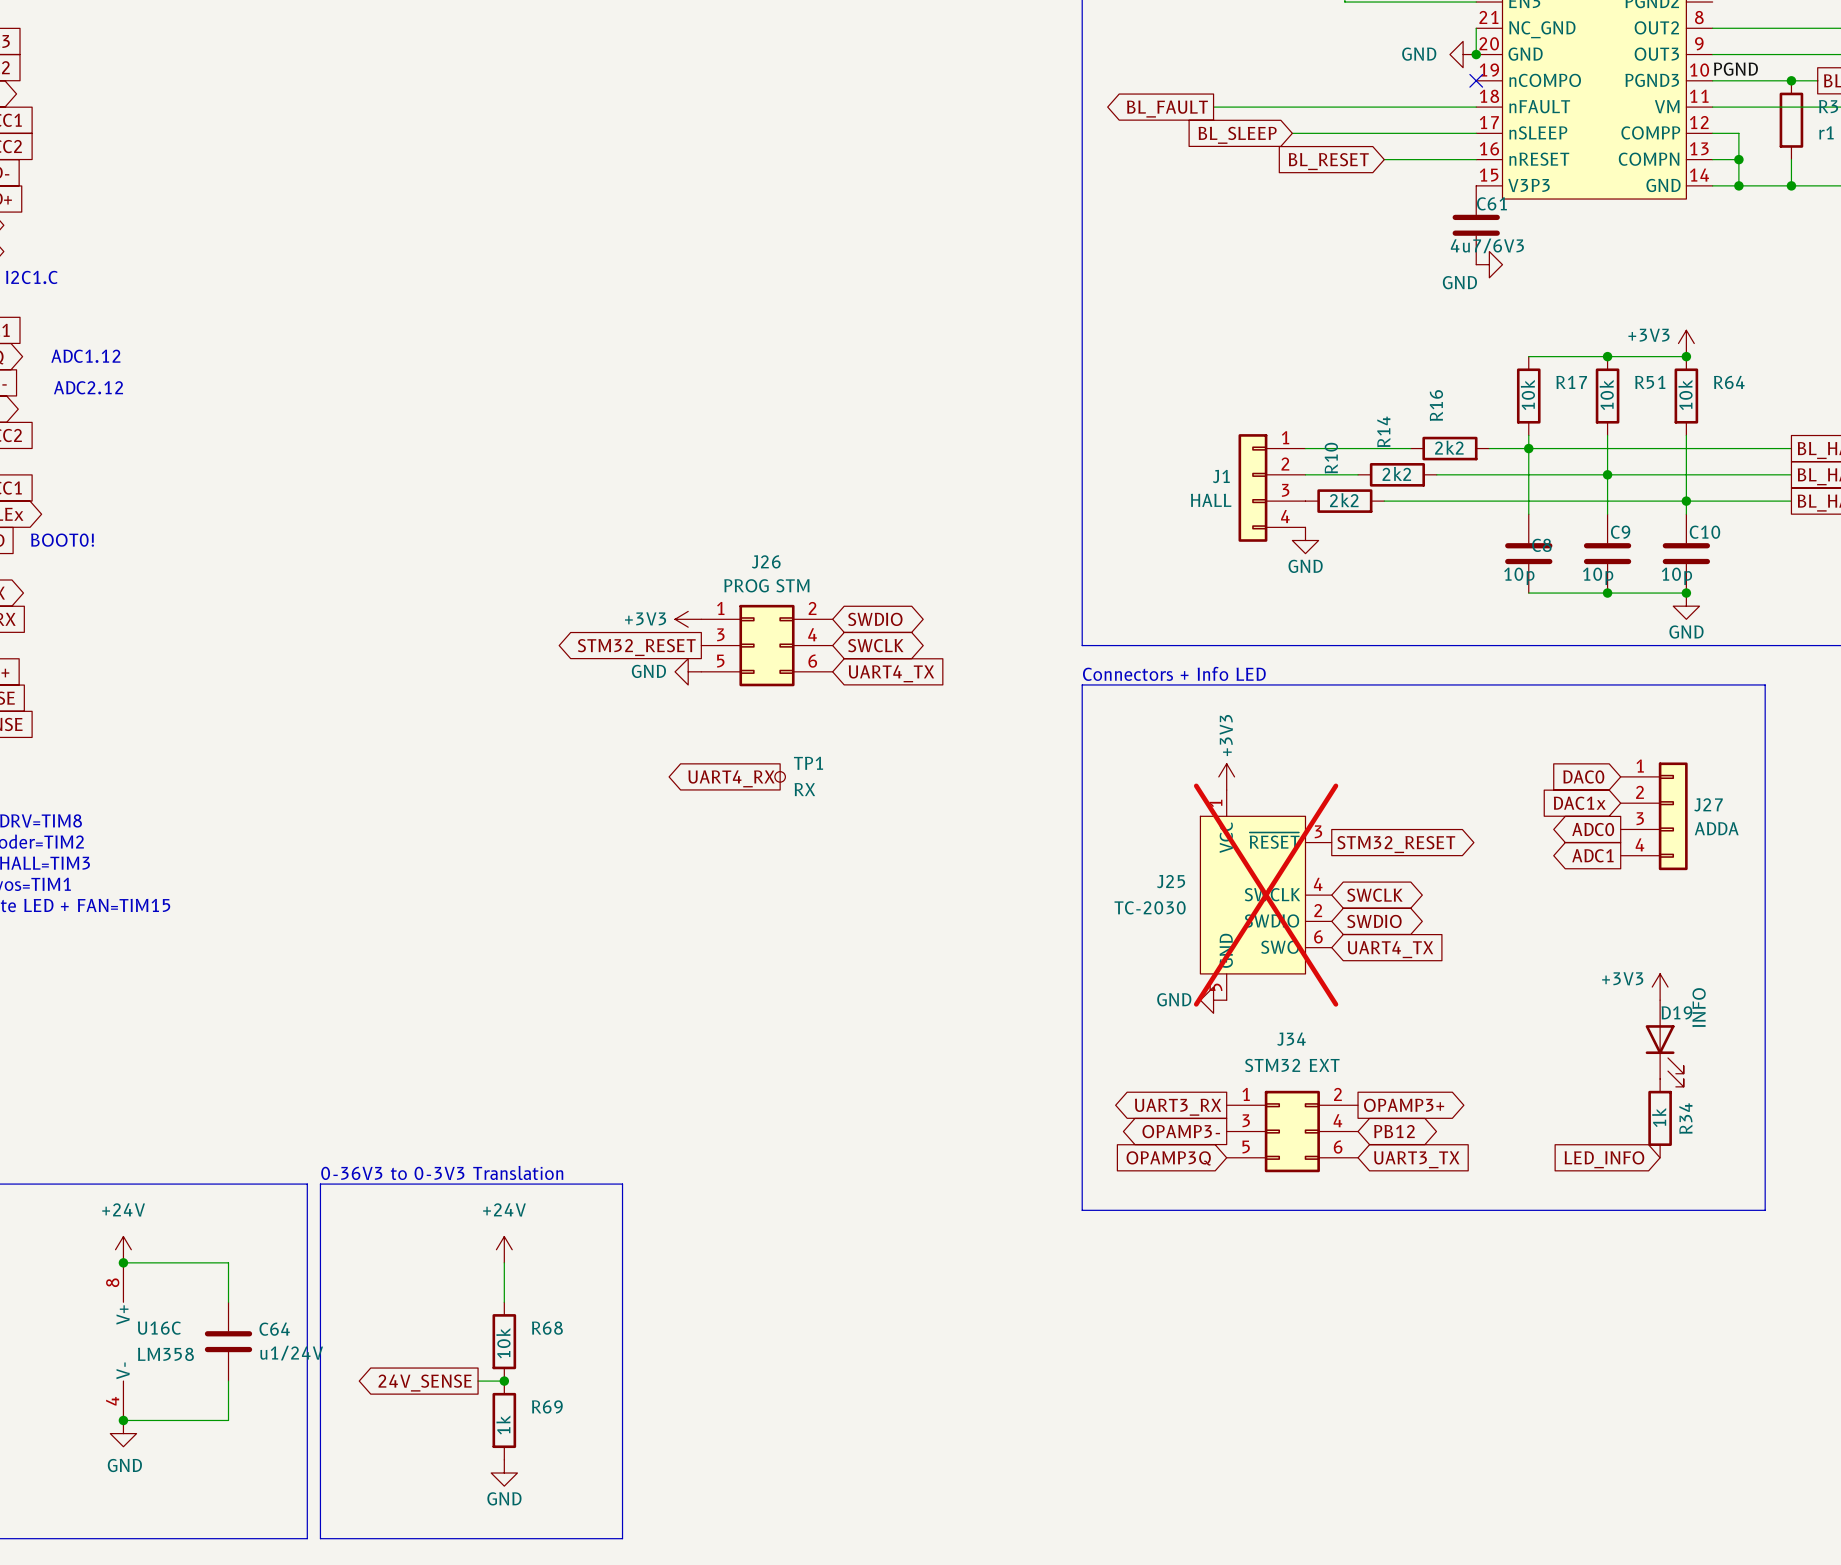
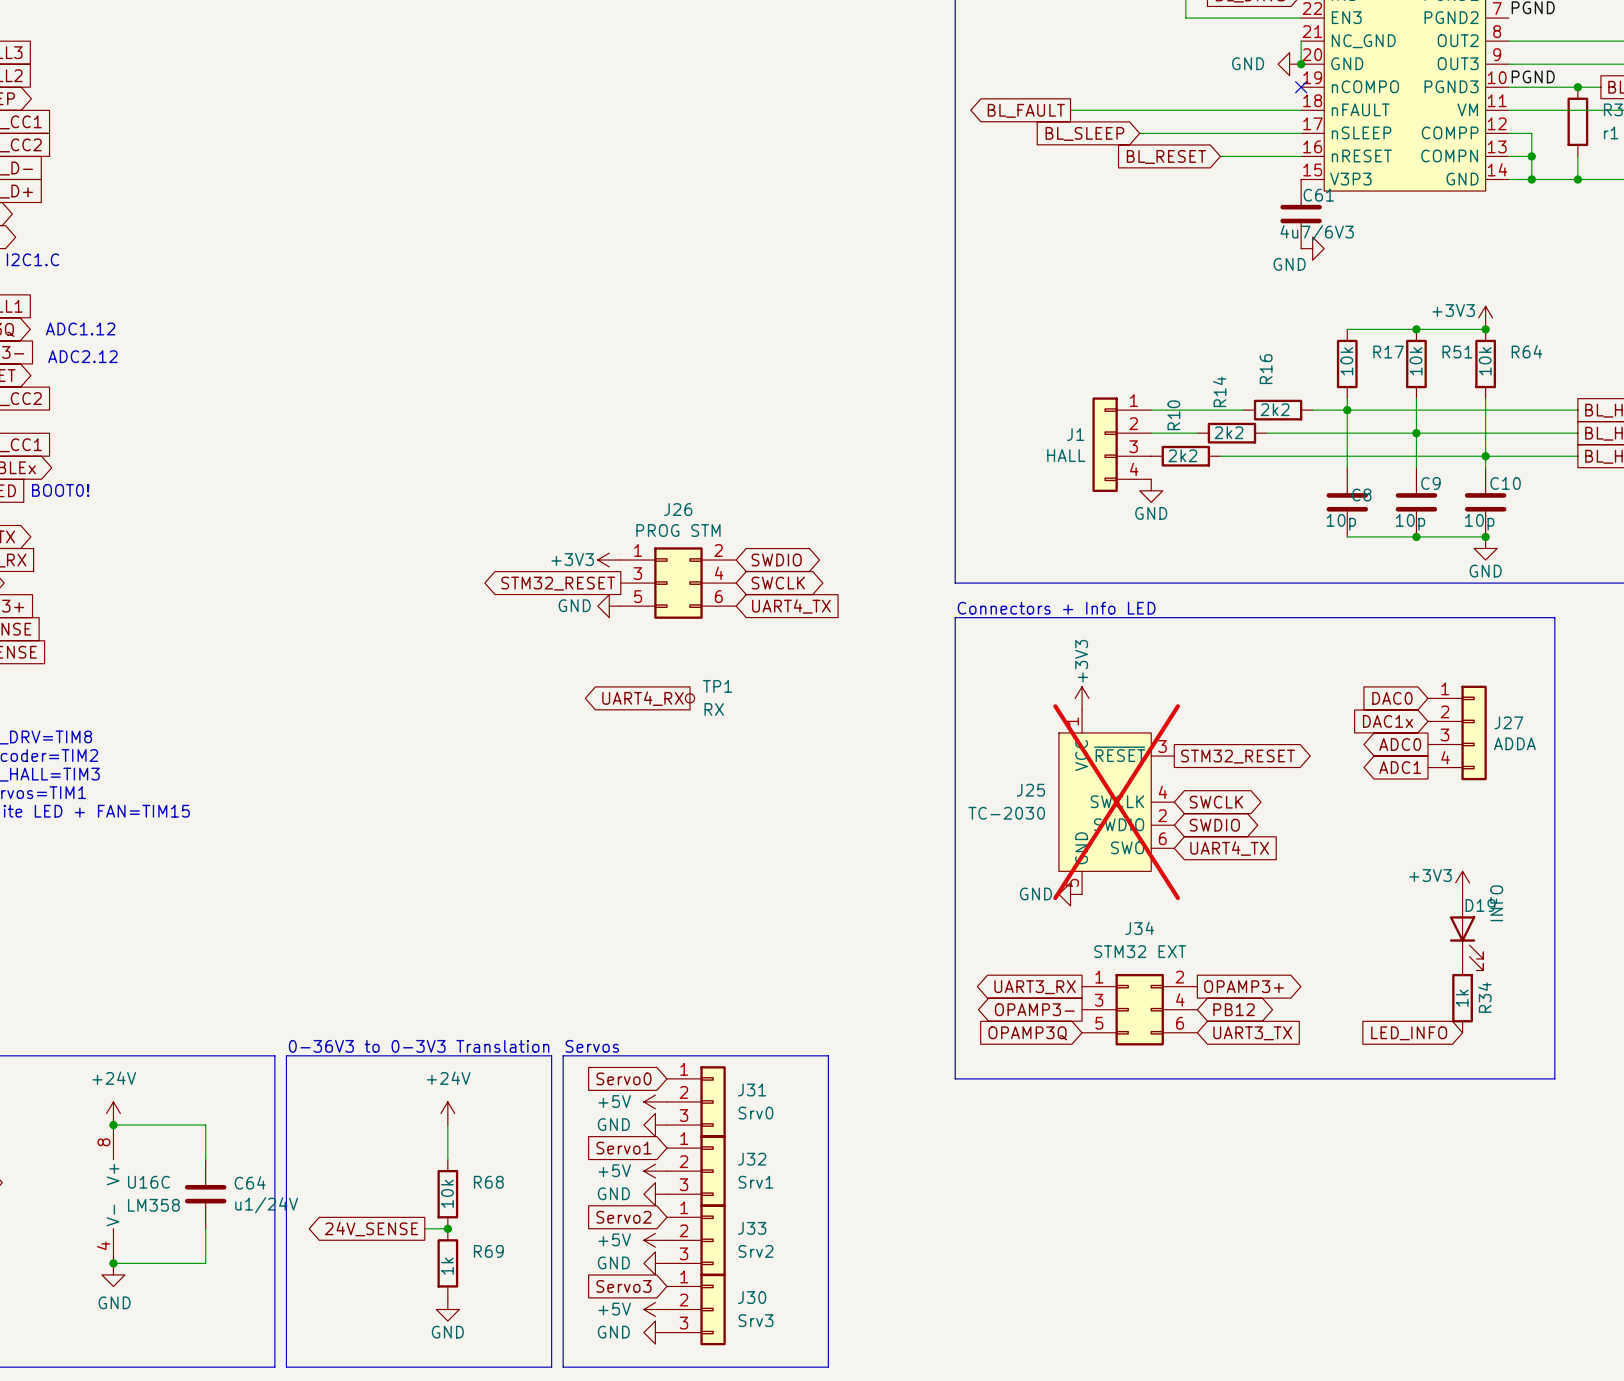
text: none -> Servos (592, 1046)
line: none -> (563, 1055) (828, 1055) (828, 1367) (563, 1367) (563, 1055)
global label: none -> Servo0 (623, 1078)
power symbol: none -> +5V (655, 1101)
J31: none -> Srv0 (696, 1101)
power symbol: none -> GND (655, 1125)
global label: none -> Servo1 (623, 1148)
power symbol: none -> +5V (655, 1171)
J32: none -> Srv1 (696, 1171)
power symbol: none -> GND (655, 1194)
global label: none -> Servo2 (623, 1217)
power symbol: none -> +5V (655, 1240)
J33: none -> Srv2 (696, 1240)
power symbol: none -> GND (655, 1263)
global label: none -> Servo3 (623, 1286)
power symbol: none -> +5V (655, 1309)
J30: none -> Srv3 (696, 1309)
power symbol: none -> GND (655, 1332)

